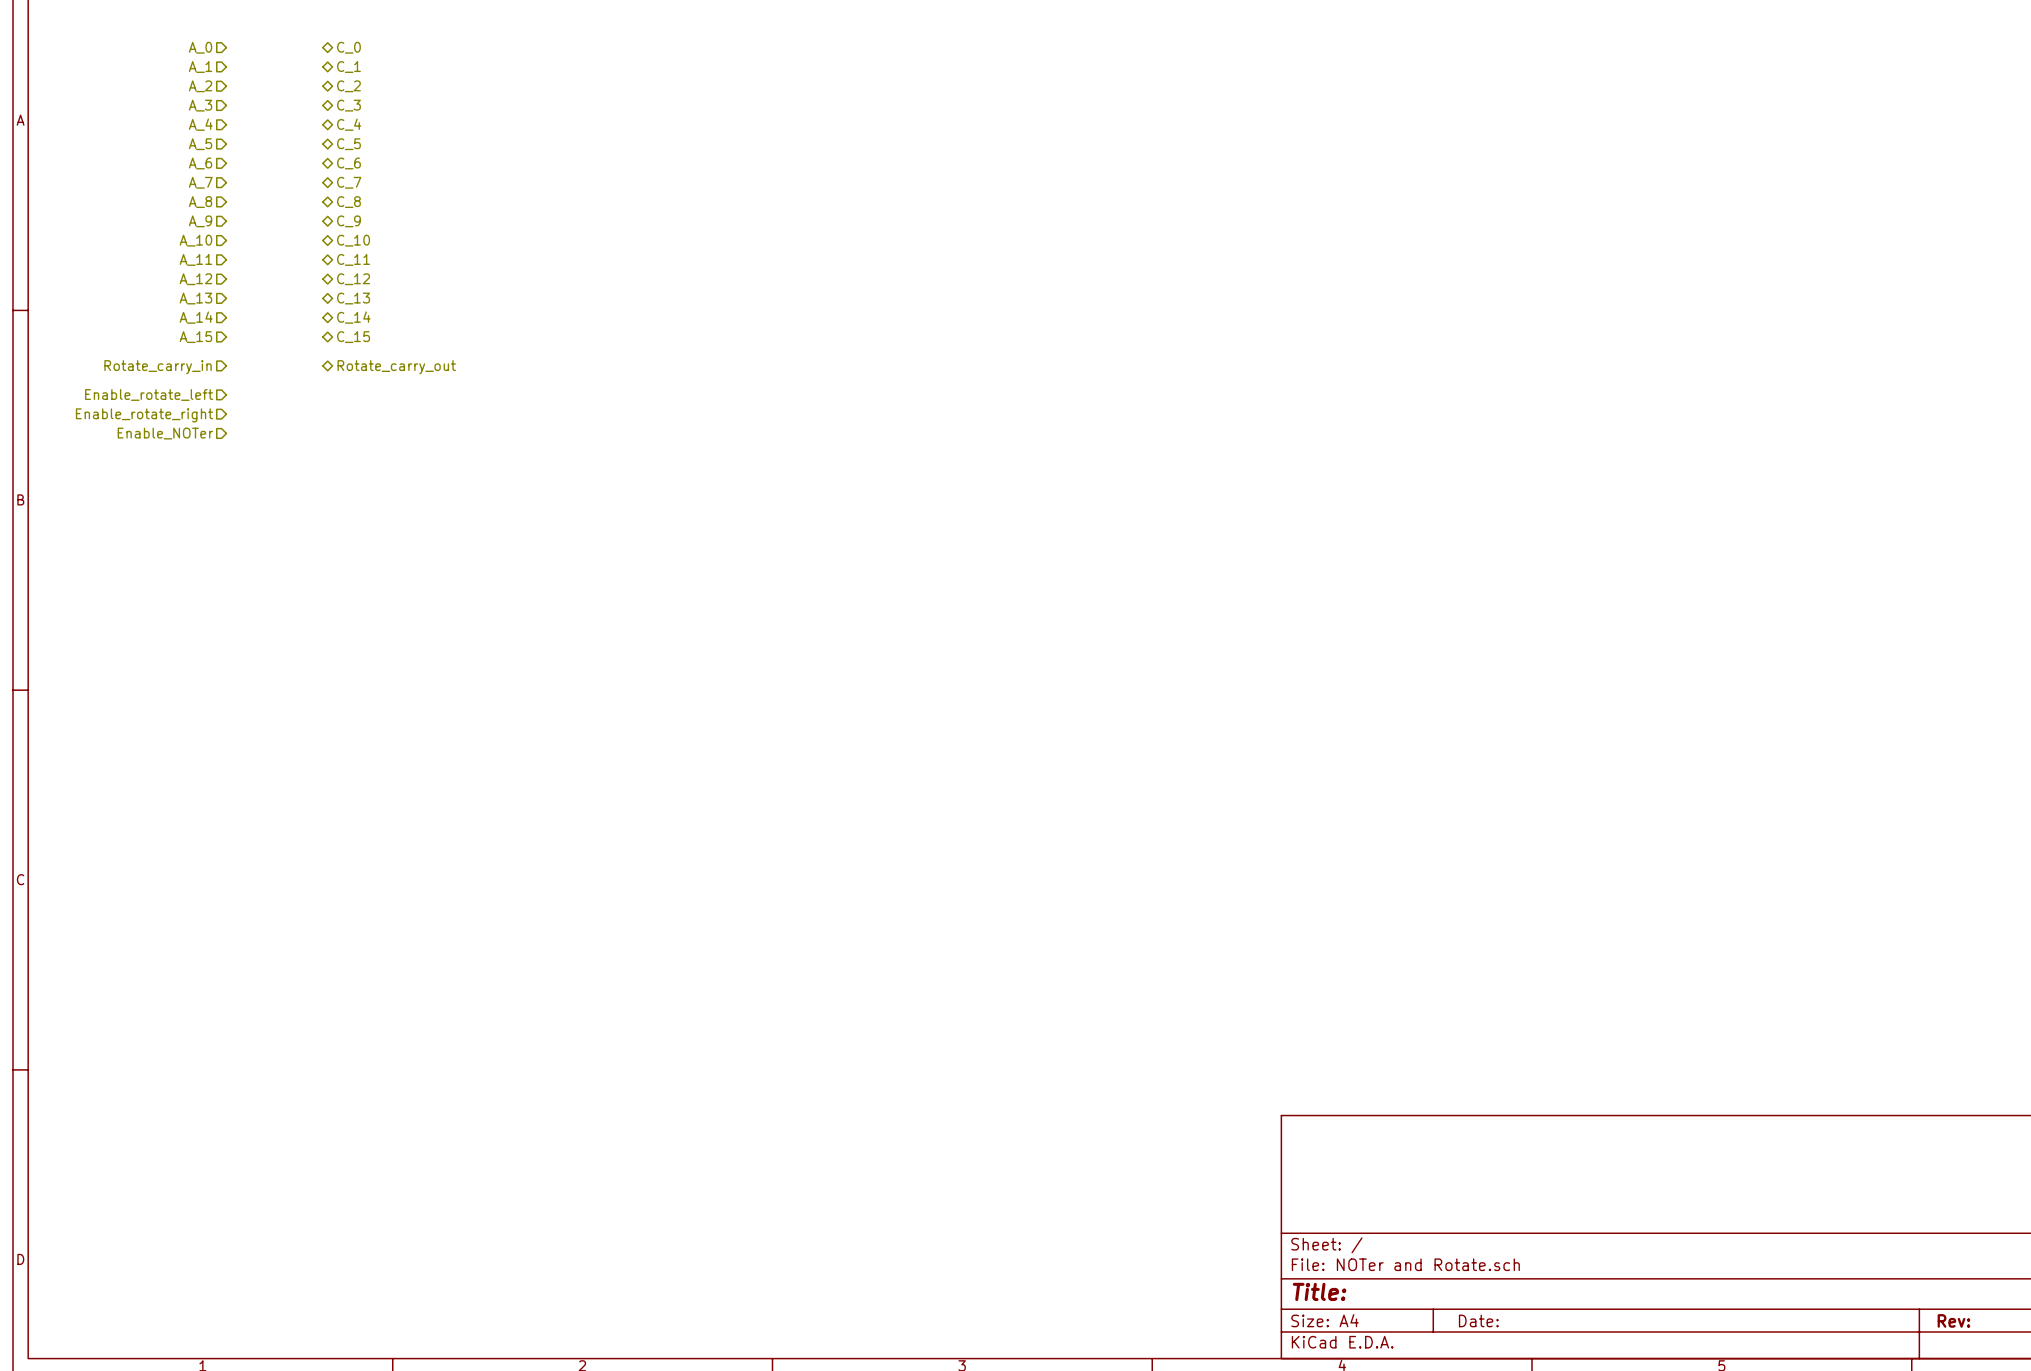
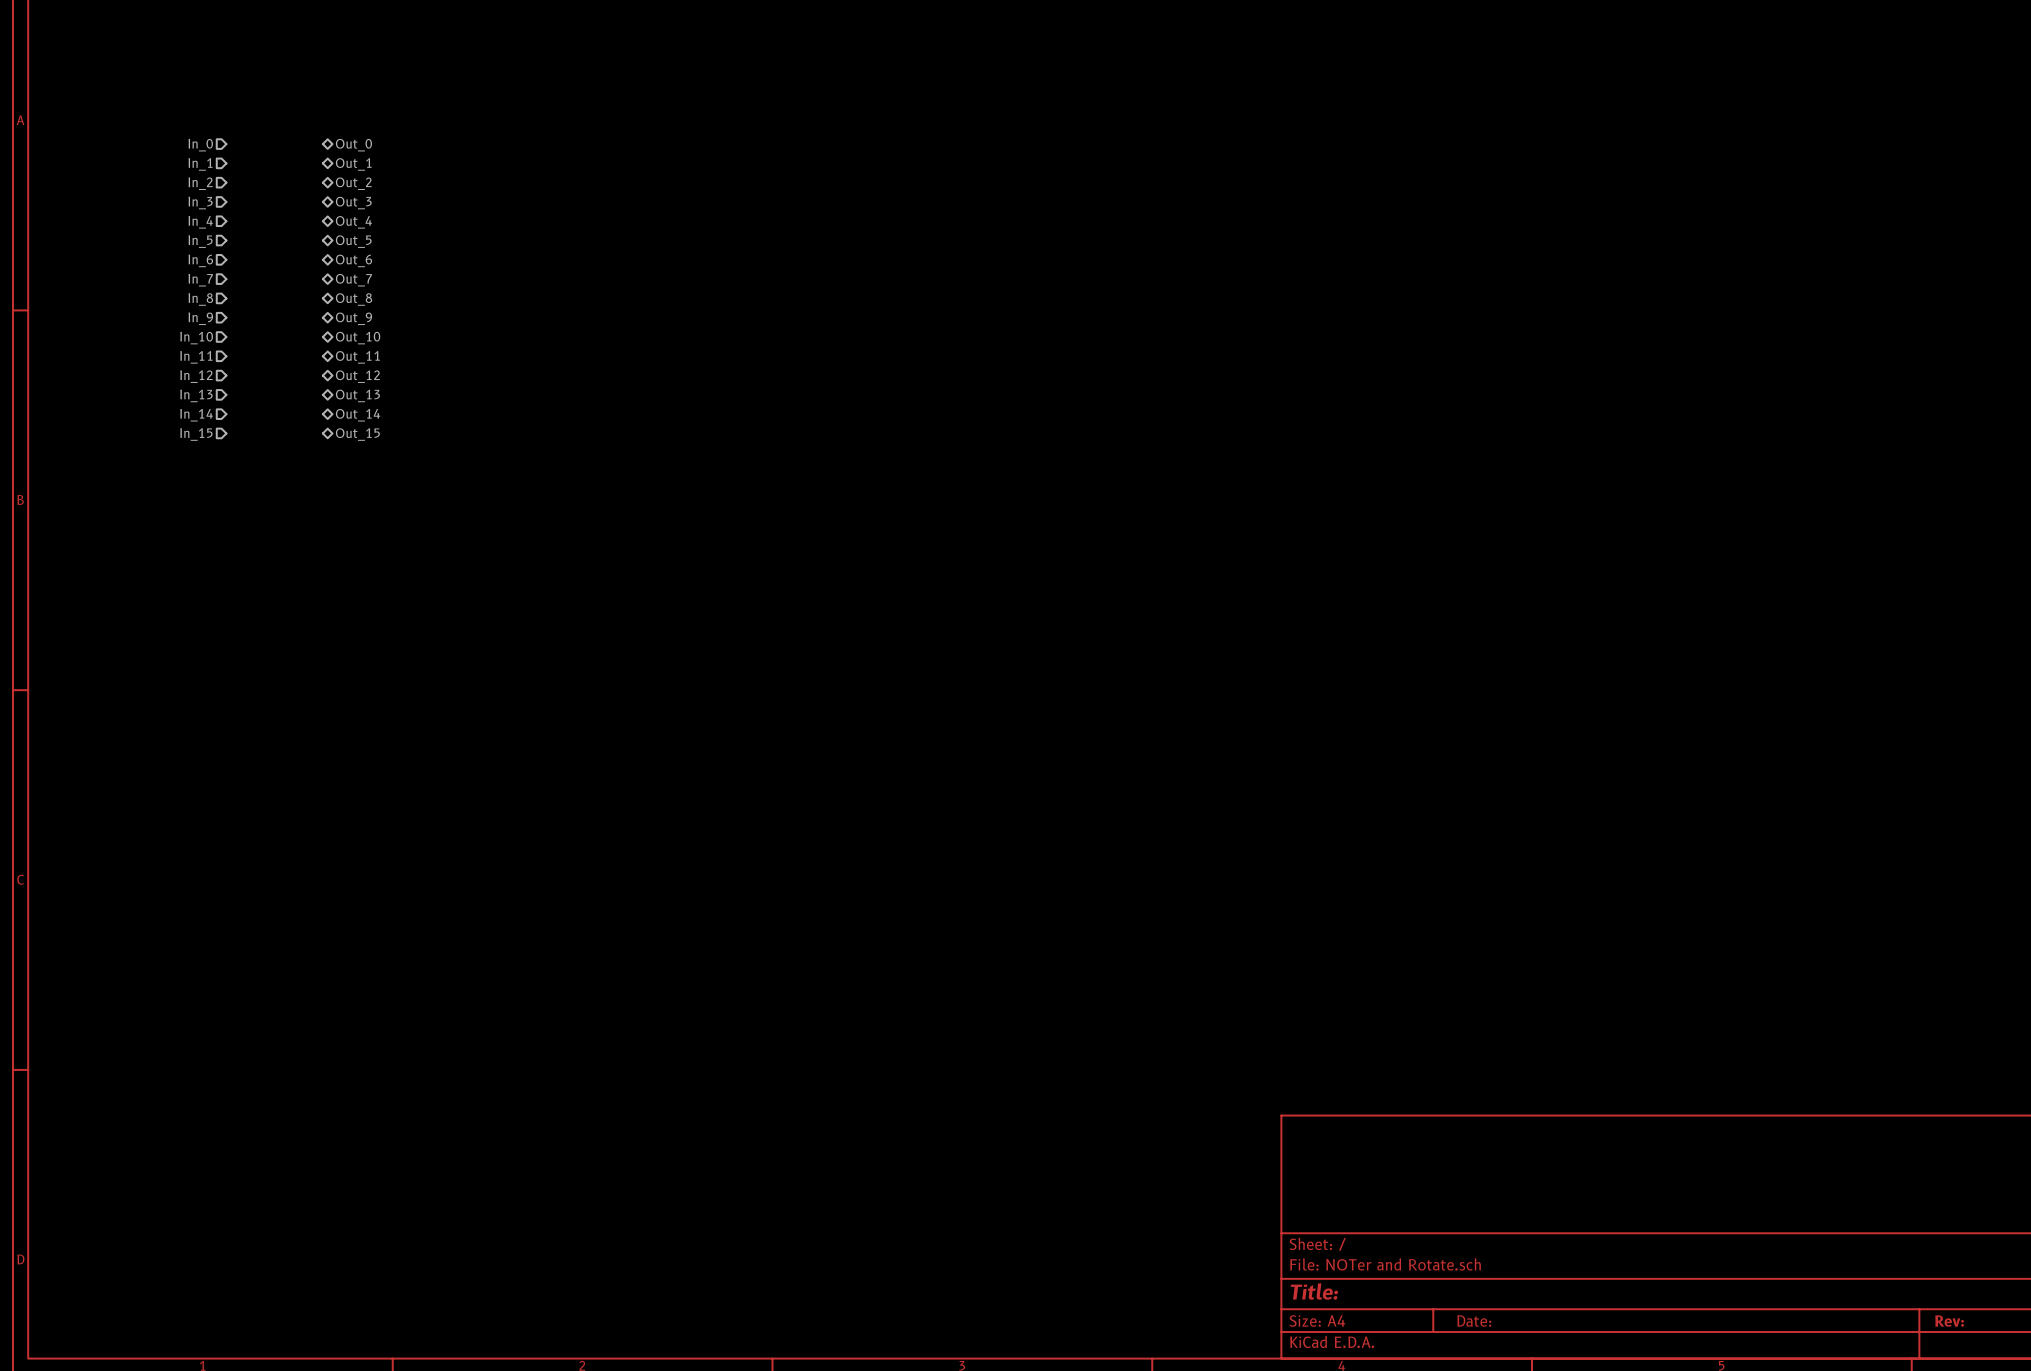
hierarchical label: A_0 (200, 47) -> none
hierarchical label: C_0 (348, 47) -> none
hierarchical label: A_1 (200, 67) -> none
hierarchical label: C_1 (348, 67) -> none
hierarchical label: A_2 (200, 86) -> none
hierarchical label: C_2 (348, 86) -> none
hierarchical label: A_3 (200, 105) -> none
hierarchical label: C_3 (348, 105) -> none
hierarchical label: A_4 (200, 124) -> none
hierarchical label: C_4 (349, 124) -> none
hierarchical label: A_5 (200, 144) -> In_0 (200, 145)
hierarchical label: C_5 (348, 144) -> Out_0 (353, 145)
hierarchical label: A_6 (200, 163) -> In_1 (200, 164)
hierarchical label: C_6 (348, 163) -> Out_1 (353, 164)
hierarchical label: A_7 (200, 182) -> In_2 (200, 183)
hierarchical label: C_7 (349, 182) -> Out_2 (353, 183)
hierarchical label: A_8 (200, 202) -> In_3 (200, 203)
hierarchical label: C_8 (348, 202) -> Out_3 (353, 203)
hierarchical label: A_9 (200, 221) -> In_4 (200, 222)
hierarchical label: C_9 (348, 221) -> Out_4 (353, 222)
hierarchical label: A_10 (195, 240) -> In_5 (200, 241)
hierarchical label: C_10 (353, 240) -> Out_5 (353, 241)
hierarchical label: A_11 (195, 259) -> In_6 (200, 260)
hierarchical label: C_11 (353, 259) -> Out_6 (354, 260)
hierarchical label: A_12 (195, 279) -> In_7 (200, 280)
hierarchical label: C_12 (353, 279) -> Out_7 (353, 280)
hierarchical label: A_13 (195, 298) -> In_8 (200, 299)
hierarchical label: C_13 (353, 298) -> Out_8 (354, 299)
hierarchical label: A_14 (196, 317) -> In_9 (200, 318)
hierarchical label: C_14 (353, 317) -> Out_9 (353, 318)
hierarchical label: A_15 (195, 337) -> In_10 (196, 338)
hierarchical label: C_15 (353, 337) -> Out_10 (358, 338)
hierarchical label: none -> In_11 (196, 357)
hierarchical label: none -> Out_11 (357, 357)
hierarchical label: Rotate_carry_in (158, 367) -> none
hierarchical label: Rotate_carry_out (396, 367) -> none
hierarchical label: none -> In_12 (196, 376)
hierarchical label: none -> Out_12 (357, 376)
hierarchical label: Enable_rotate_left (149, 394) -> In_13 (196, 395)
hierarchical label: none -> Out_13 (357, 395)
hierarchical label: none -> Out_14 (358, 415)
hierarchical label: Enable_rotate_right (144, 415) -> In_14 (196, 415)
hierarchical label: Enable_NOTer (165, 433) -> In_15 (196, 434)
hierarchical label: none -> Out_15 (357, 434)

